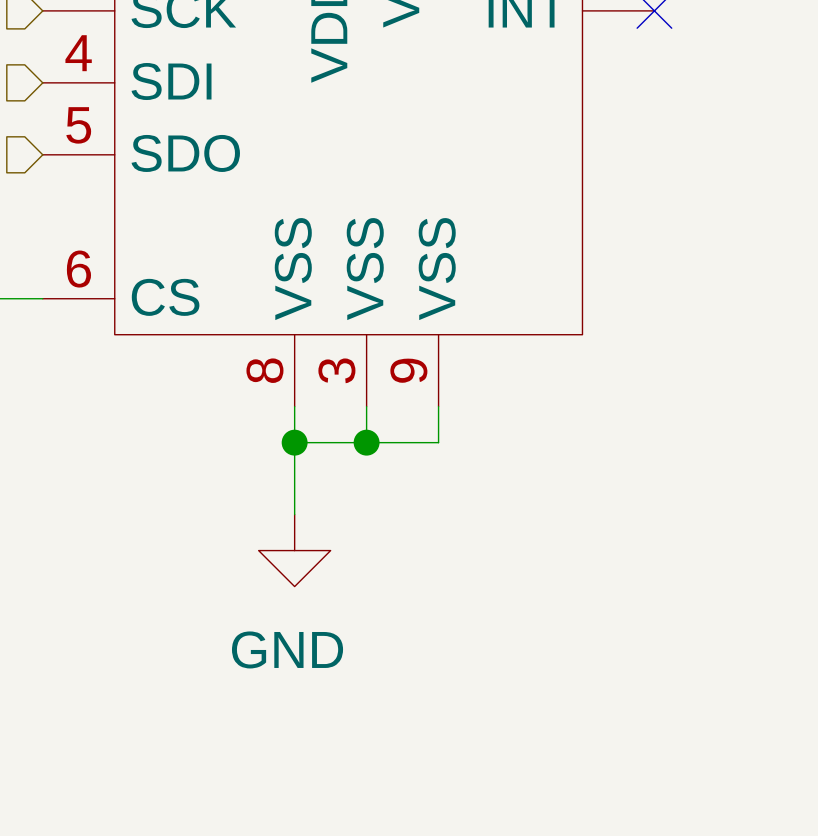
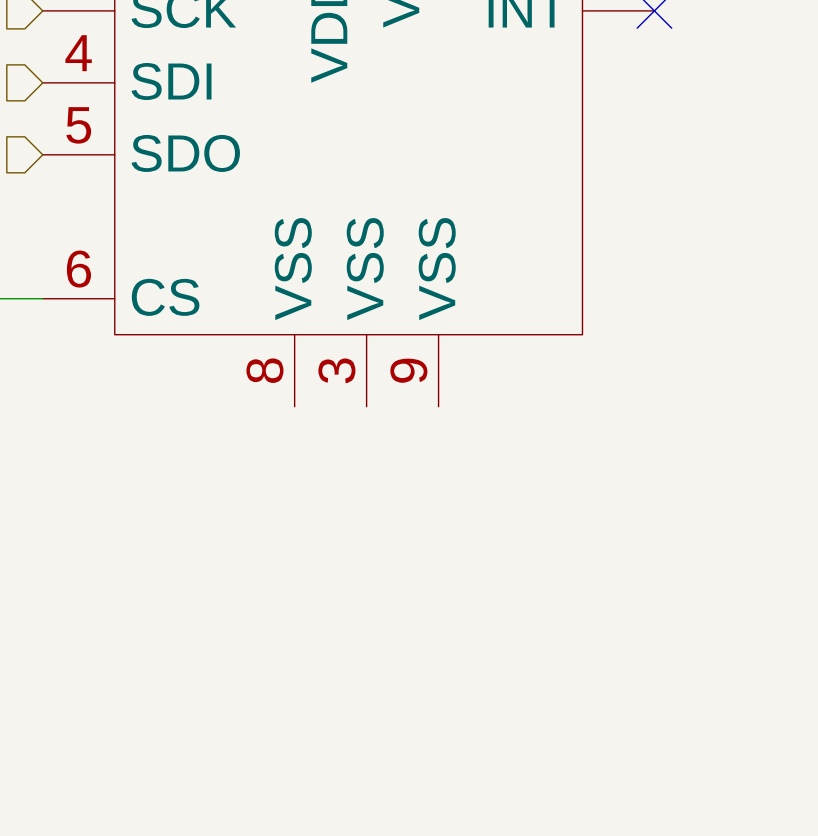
wire: (294, 406) (294, 514) -> none
wire: (366, 406) (366, 442) -> none
wire: (438, 406) (438, 442) (294, 442) -> none
junction: (294, 442) -> none
junction: (366, 442) -> none
power symbol: GND (294, 550) -> none

